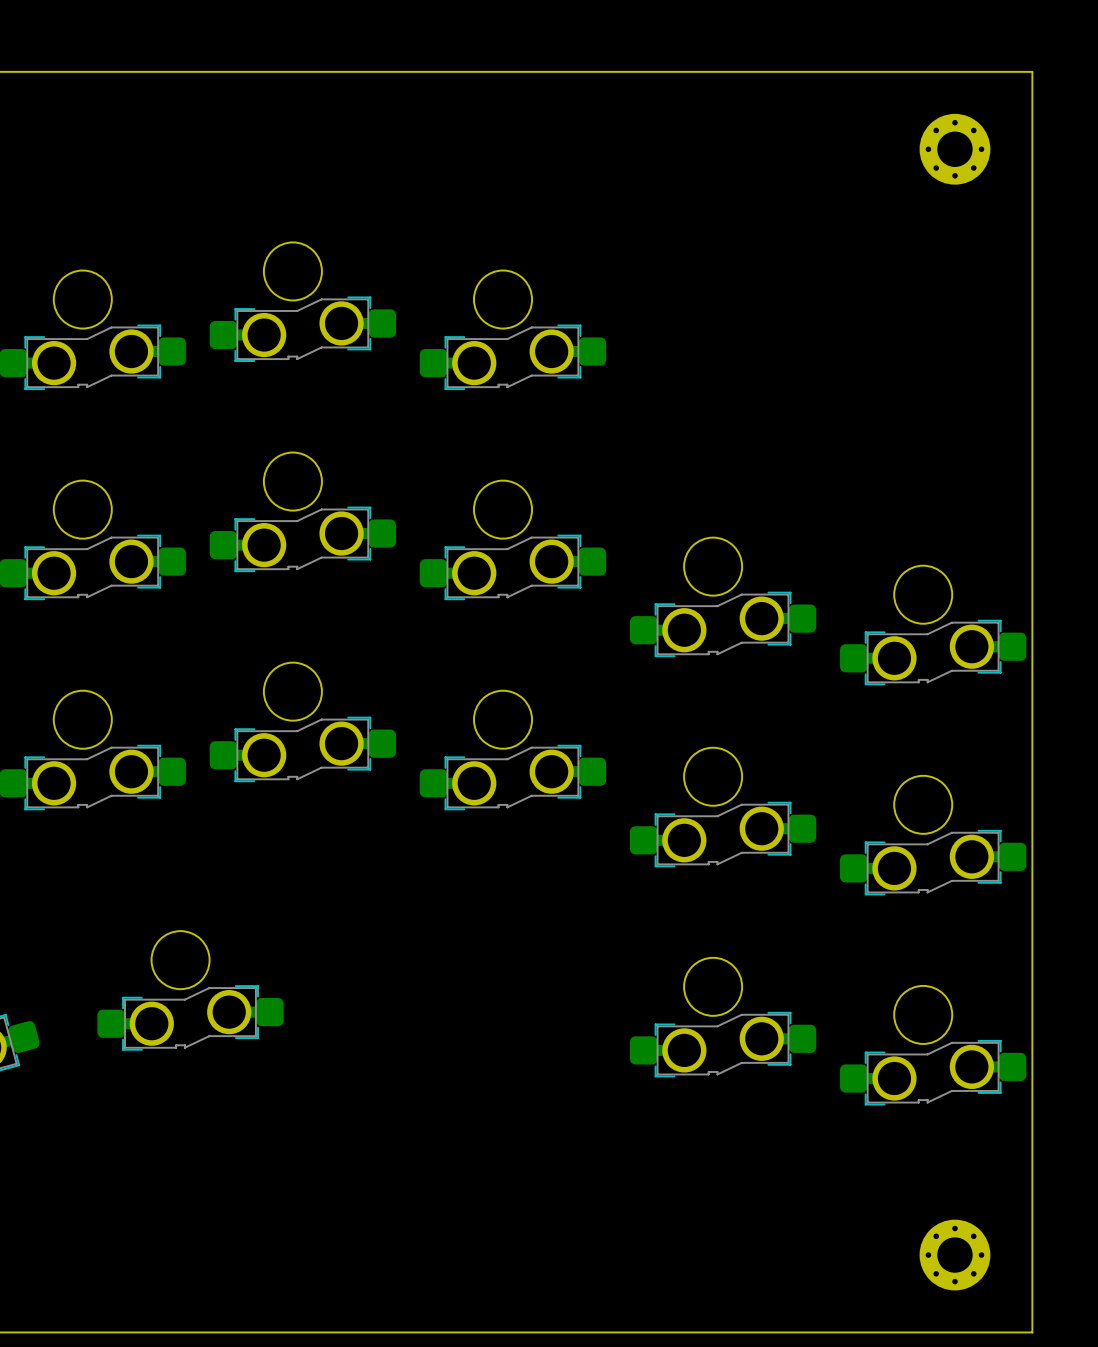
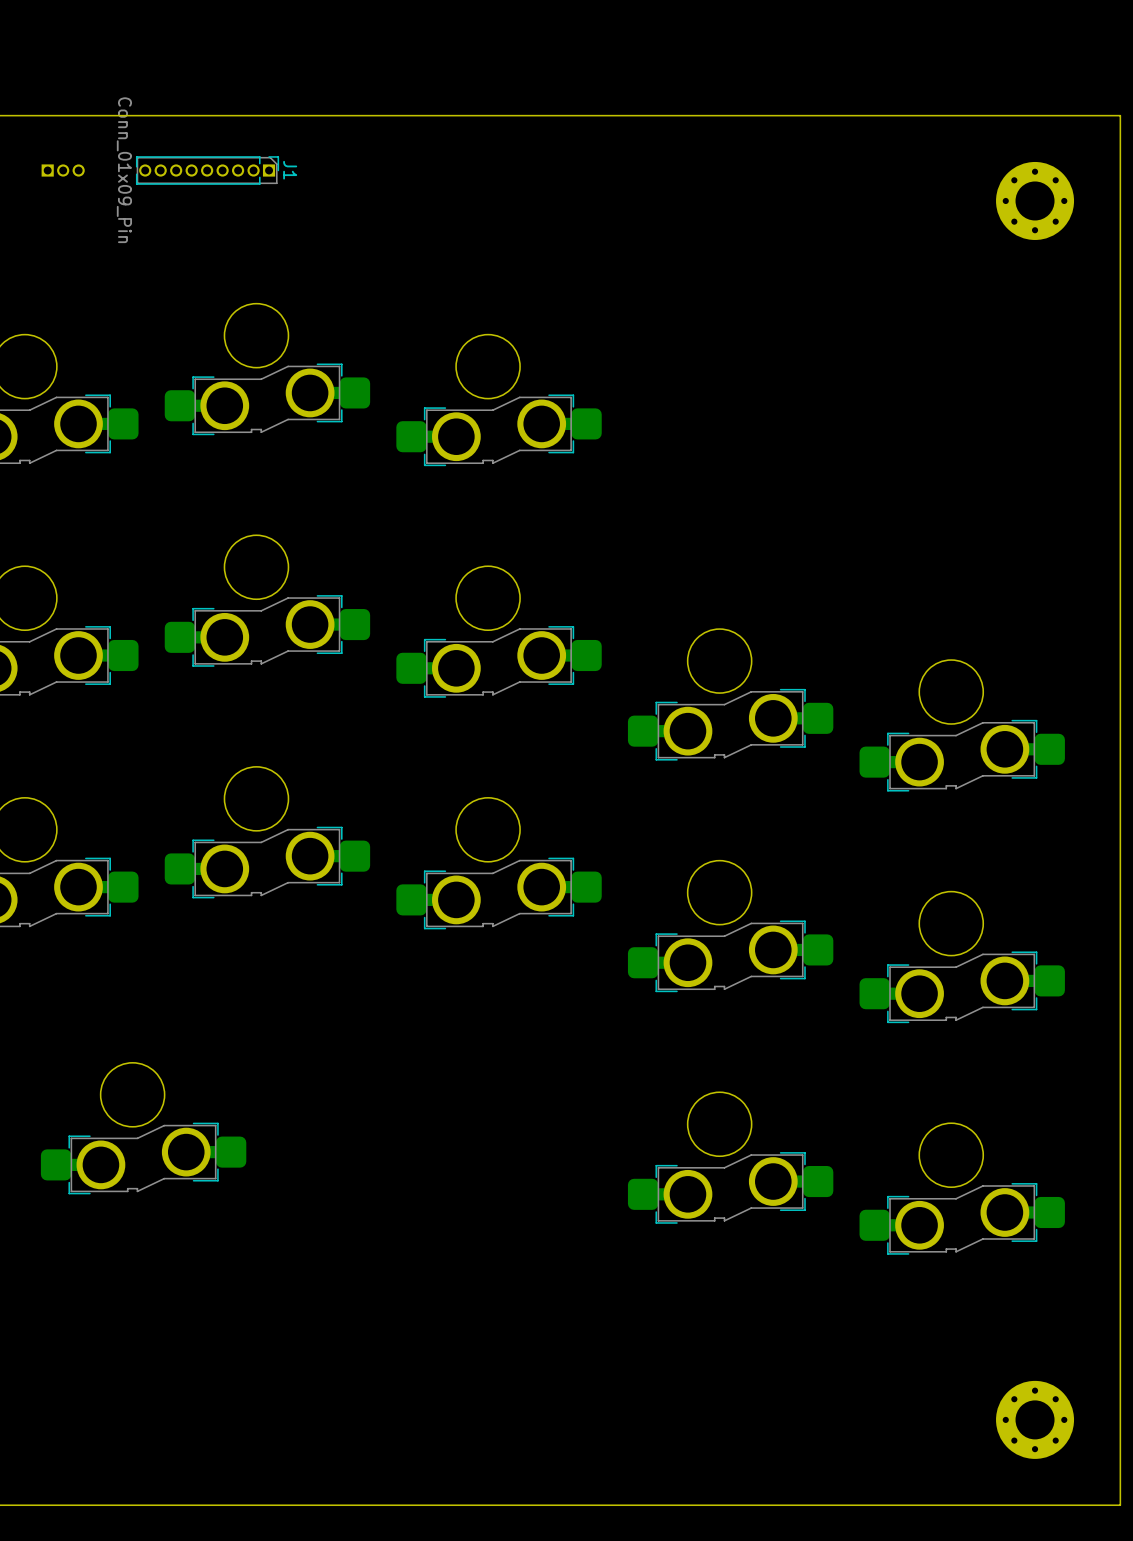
board edge: (1032, 71) (1032, 1332) -> (1071, 115) (1120, 115) (1120, 1505) (1071, 1505)
part: none -> (63, 170)
J1: none -> Conn_01x09_Pin (207, 170)
part position: (954, 149) -> (1035, 200)
part position: (954, 1255) -> (1035, 1419)

